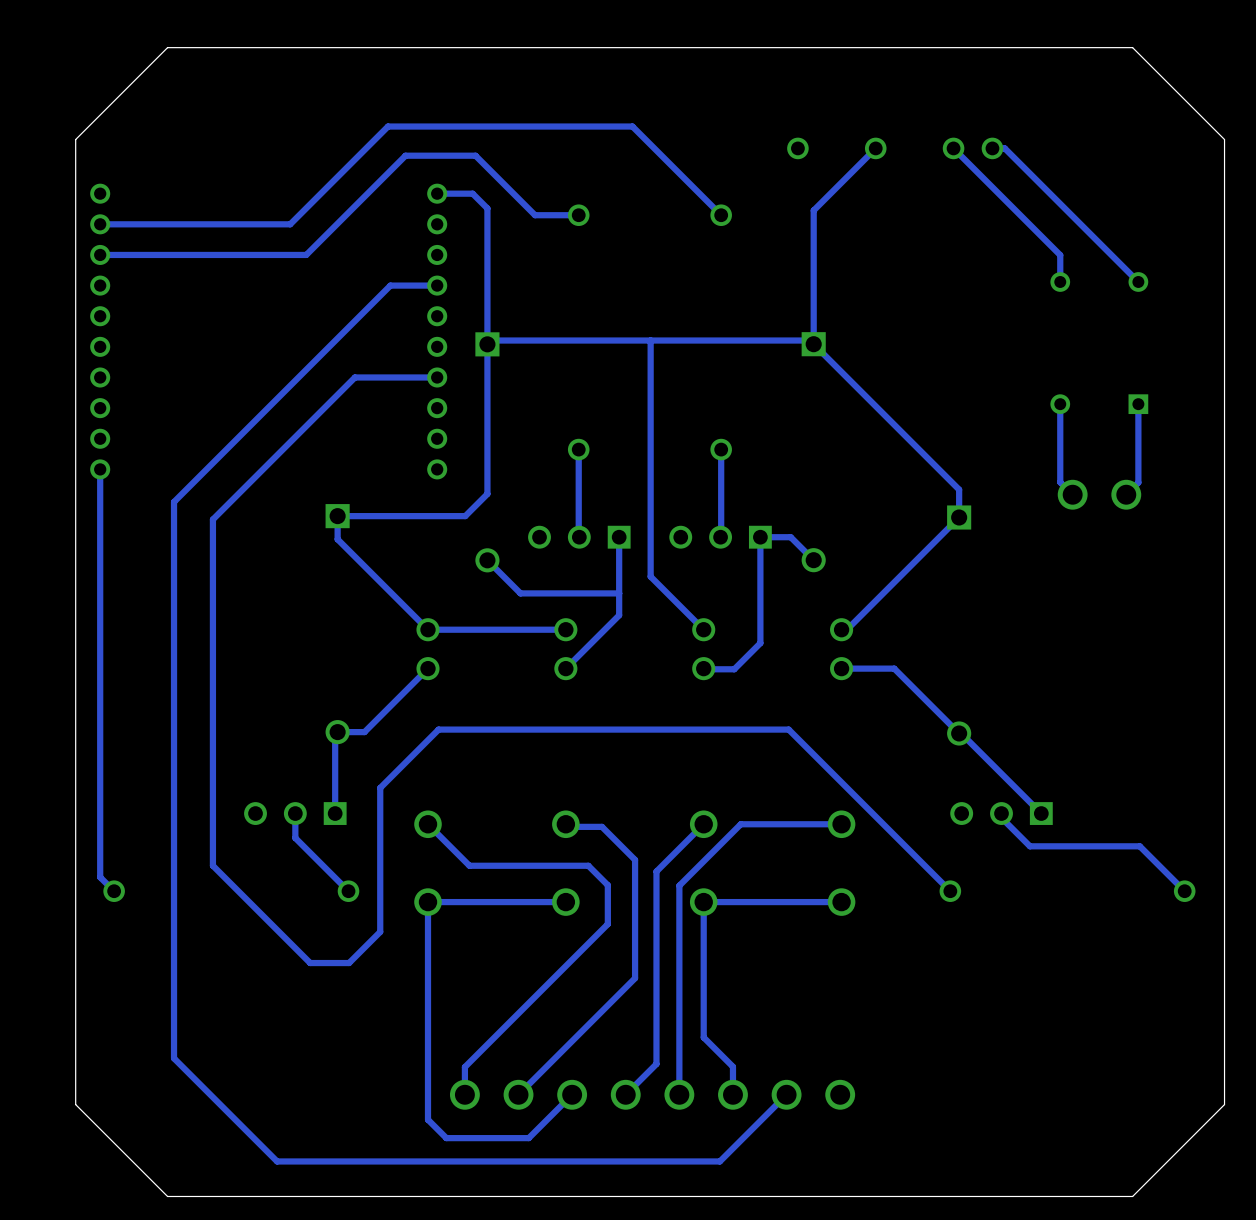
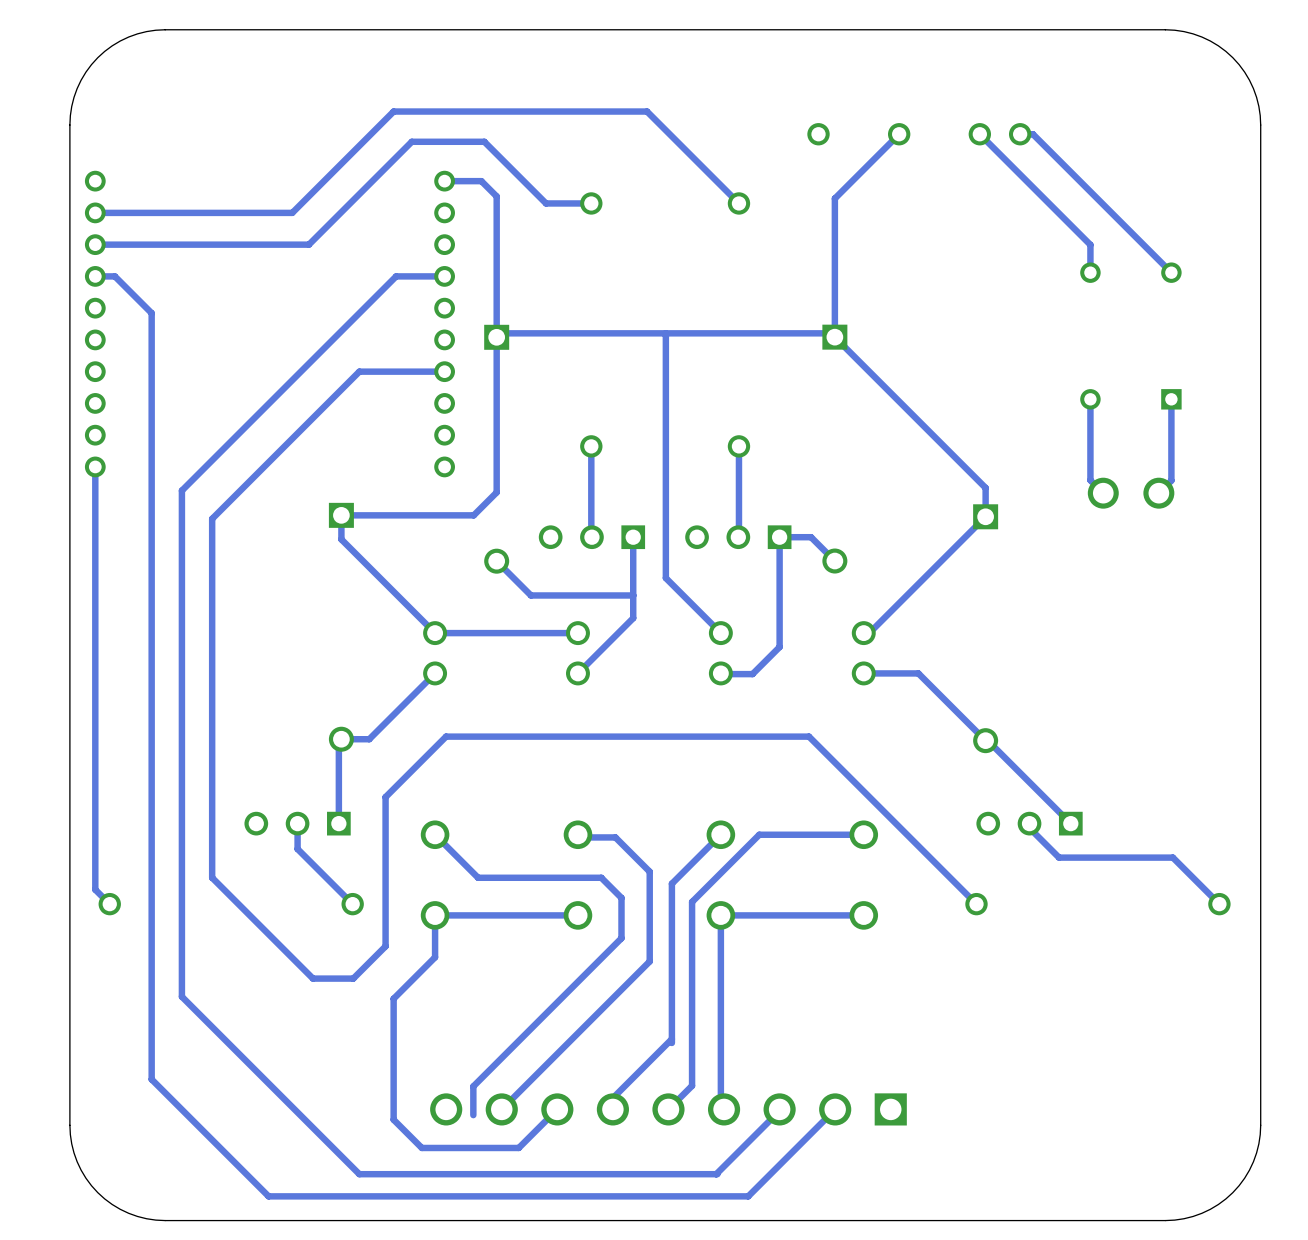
board edge: (167, 47) (75, 139) -> (165, 29) (146, 31) (128, 37) (112, 45) (97, 57) (85, 72) (77, 88) (71, 106) (69, 125)
board edge: (1132, 47) (1224, 139) -> (1165, 29) (1184, 31) (1201, 37) (1218, 45) (1232, 57) (1244, 72) (1253, 88) (1258, 106) (1260, 125)
bottom track: none -> (95, 276) (114, 276) (151, 313) (151, 1079) (268, 1196) (748, 1196) (835, 1109)
bottom track: (183, 492) (174, 501) (174, 1058) (277, 1161) (719, 1161) (786, 1094) -> (181, 490) (181, 996) (359, 1174) (717, 1174)
bottom track: (679, 885) (679, 1094) -> (695, 898) (692, 901) (692, 1085) (668, 1109)
bottom track: (428, 942) (428, 1119) (446, 1138) (528, 1138) (572, 1094) -> (435, 957) (393, 998) (393, 1119) (421, 1147) (518, 1147) (557, 1109)
bottom track: (635, 946) (635, 978) (518, 1094) -> (649, 961) (501, 1109)
bottom track: none -> (671, 1039) (612, 1098) (612, 1109)
bottom track: (656, 1025) (656, 1064) (625, 1094) -> none
bottom track: (703, 1037) (732, 1066) (732, 1094) -> (720, 1055) (720, 1106) (724, 1109)
part footprint: [449, 1079, 856, 1110] -> [430, 1093, 907, 1126]
bottom track: none -> (779, 1109) (716, 1174)
board edge: (75, 1104) (167, 1196) -> (69, 1125) (71, 1143) (77, 1161) (85, 1178) (97, 1192) (112, 1204) (128, 1213) (146, 1218) (165, 1220)
board edge: (1224, 1104) (1132, 1196) -> (1260, 1125) (1258, 1143) (1253, 1161) (1244, 1178) (1232, 1192) (1218, 1204) (1201, 1213) (1184, 1218) (1165, 1220)

